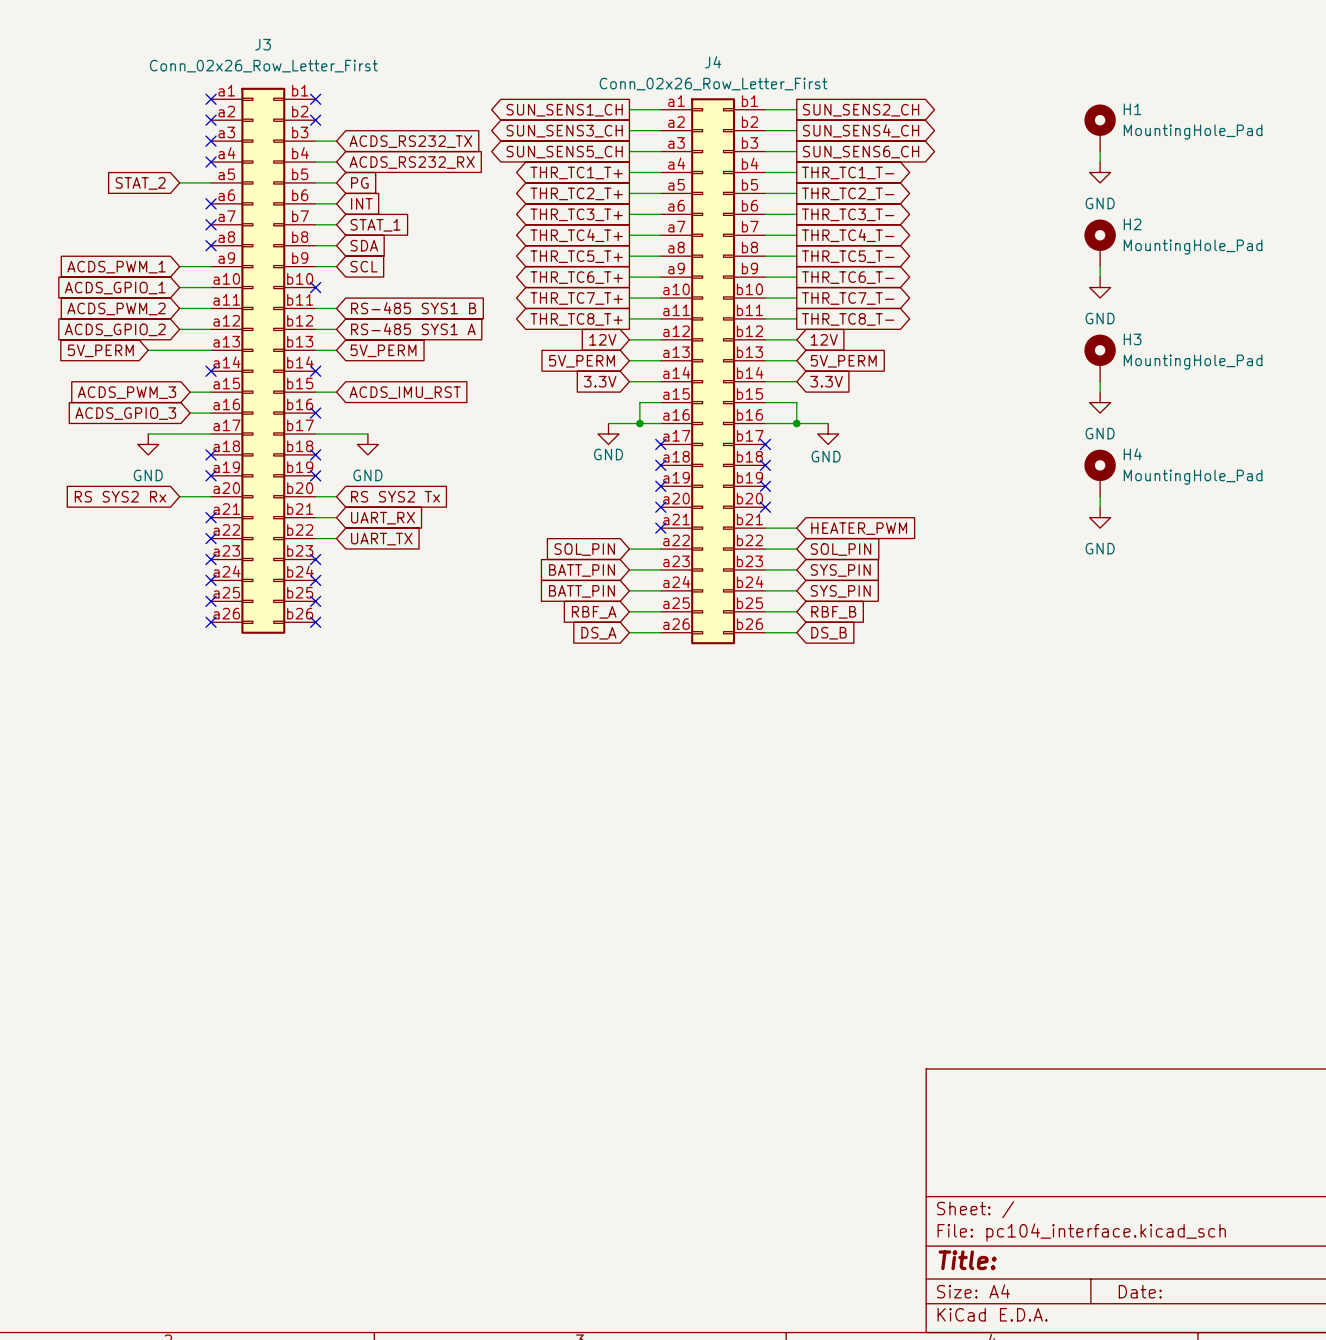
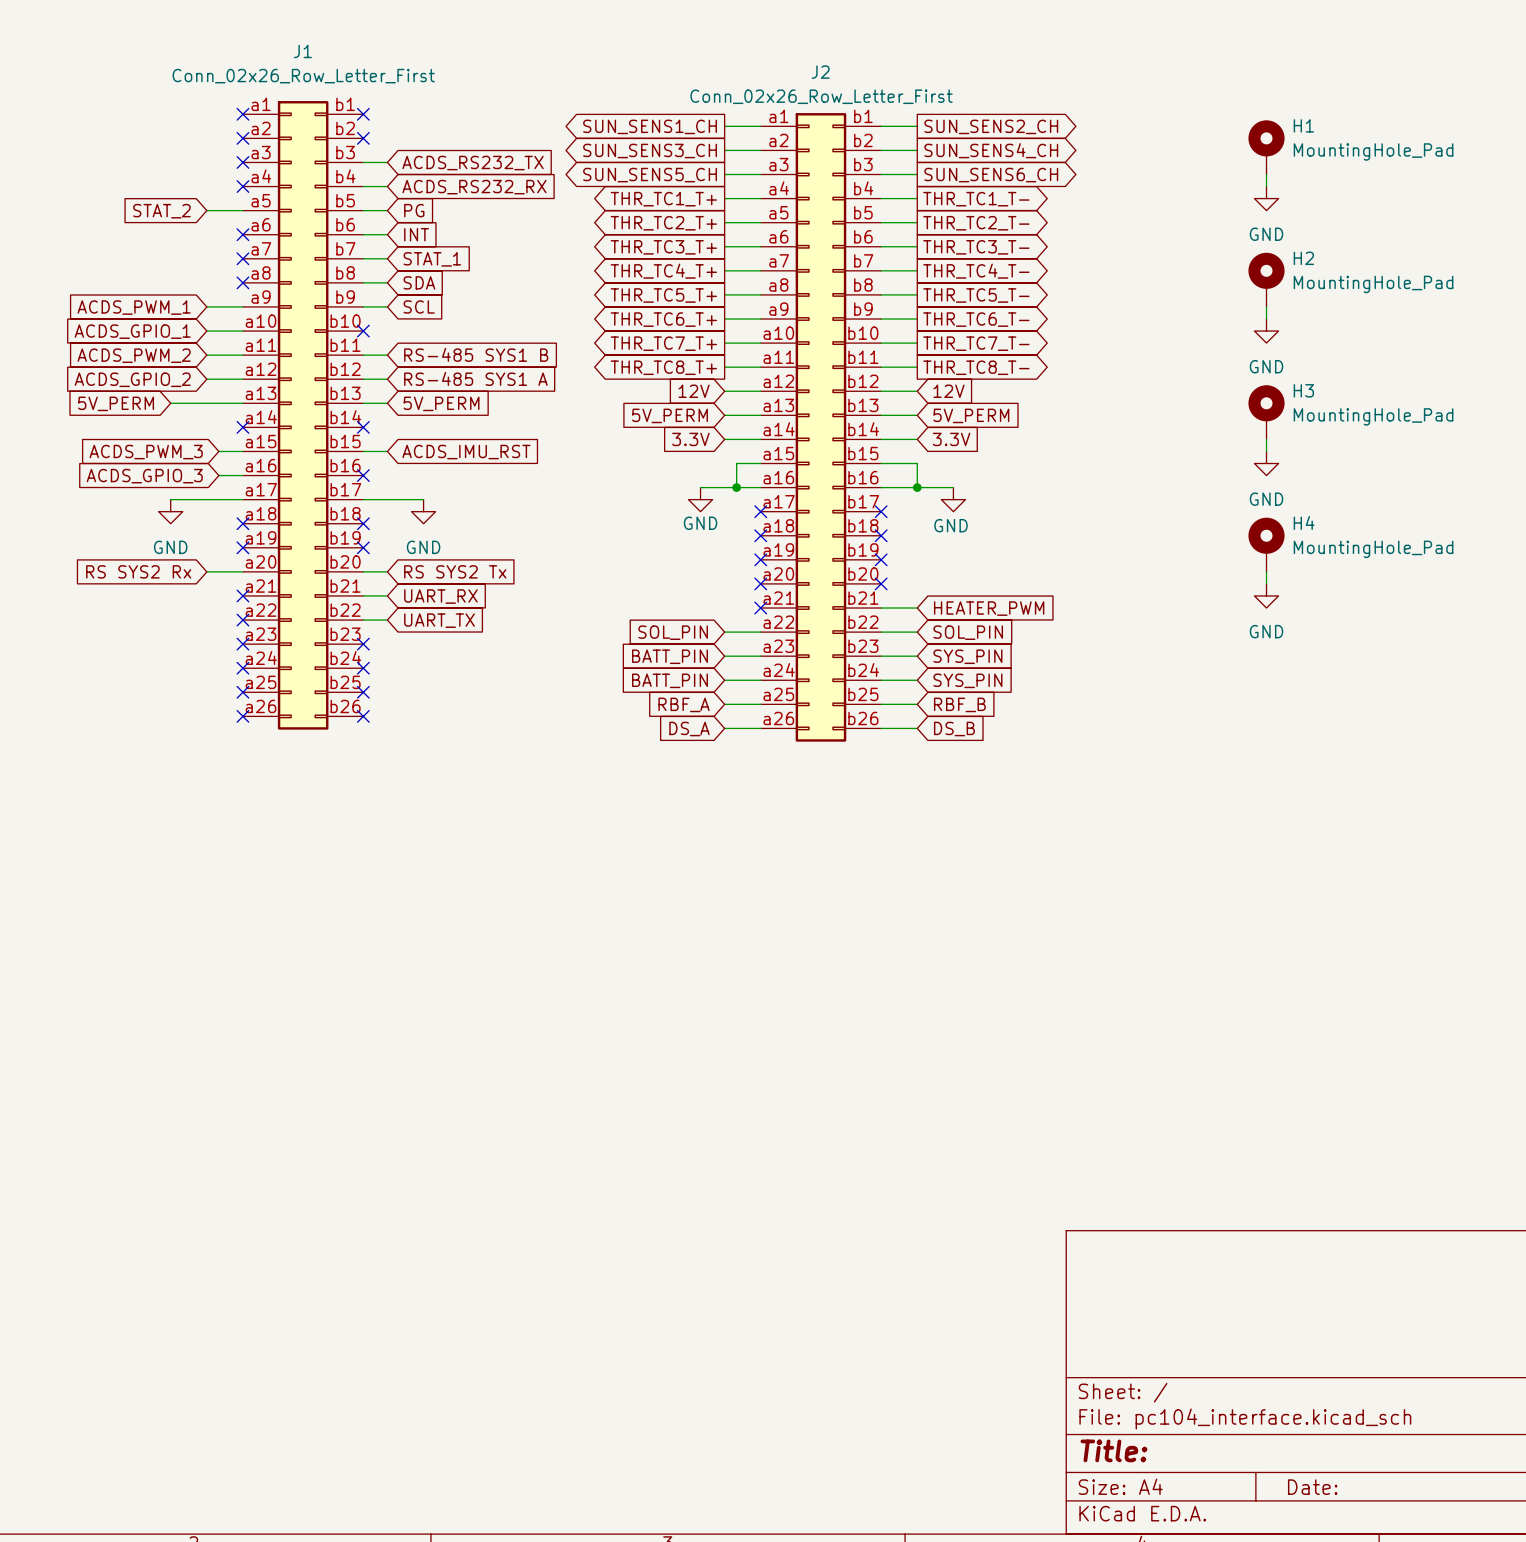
J3 name: J3 (263, 44) -> J1 (302, 51)
J4 name: J4 (713, 62) -> J2 (820, 72)

